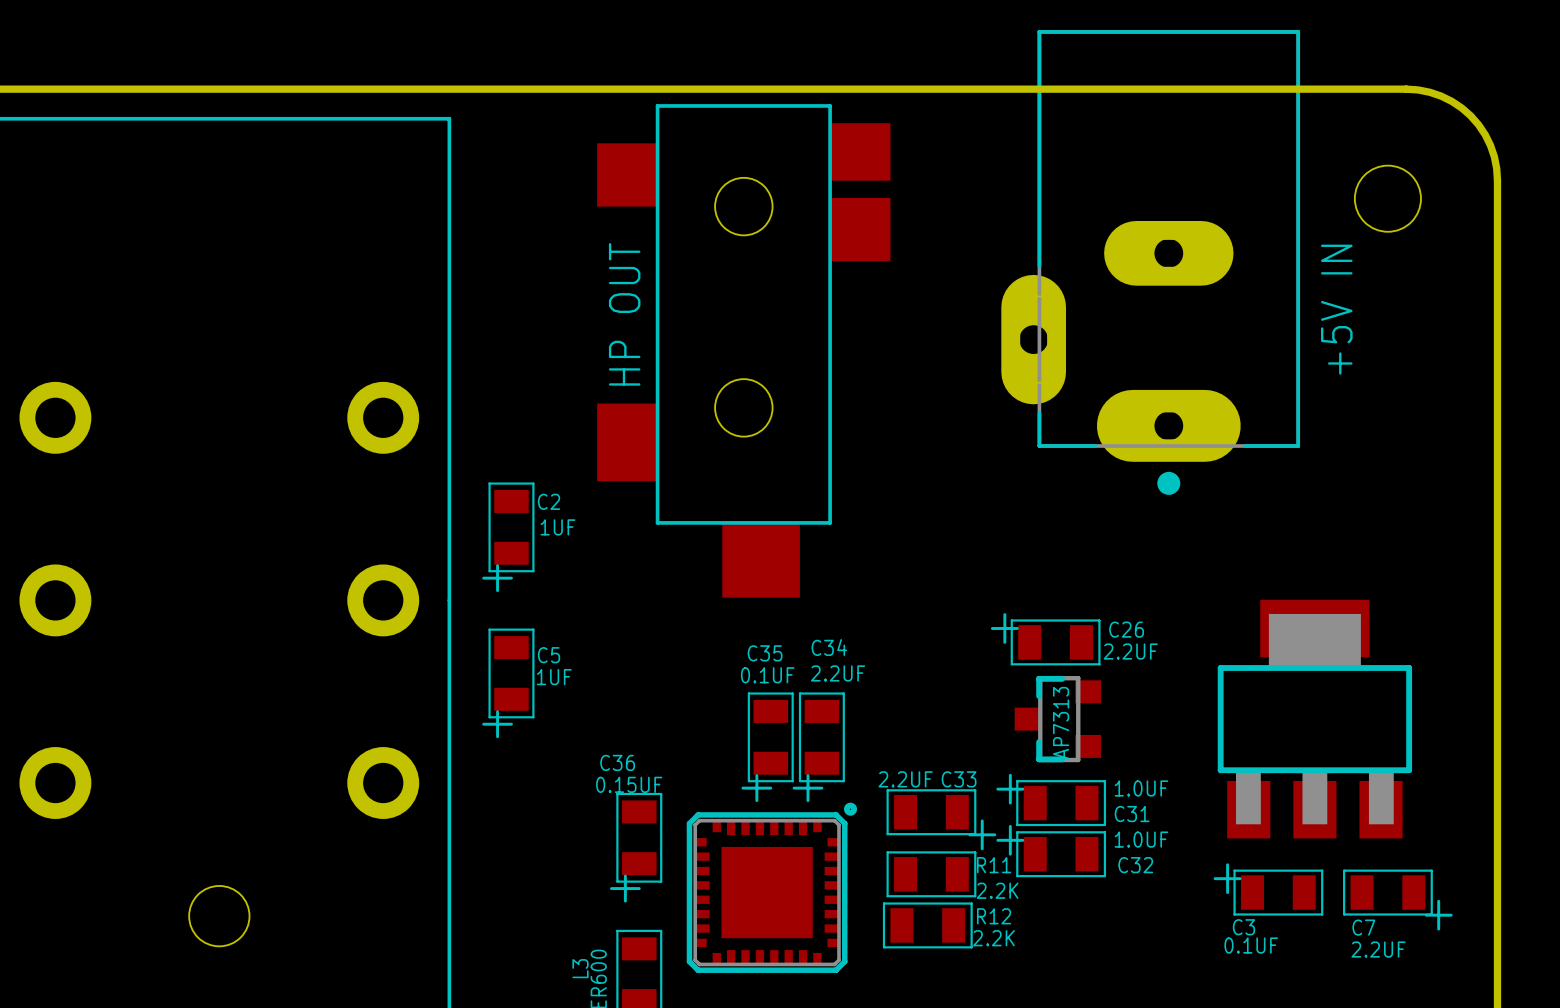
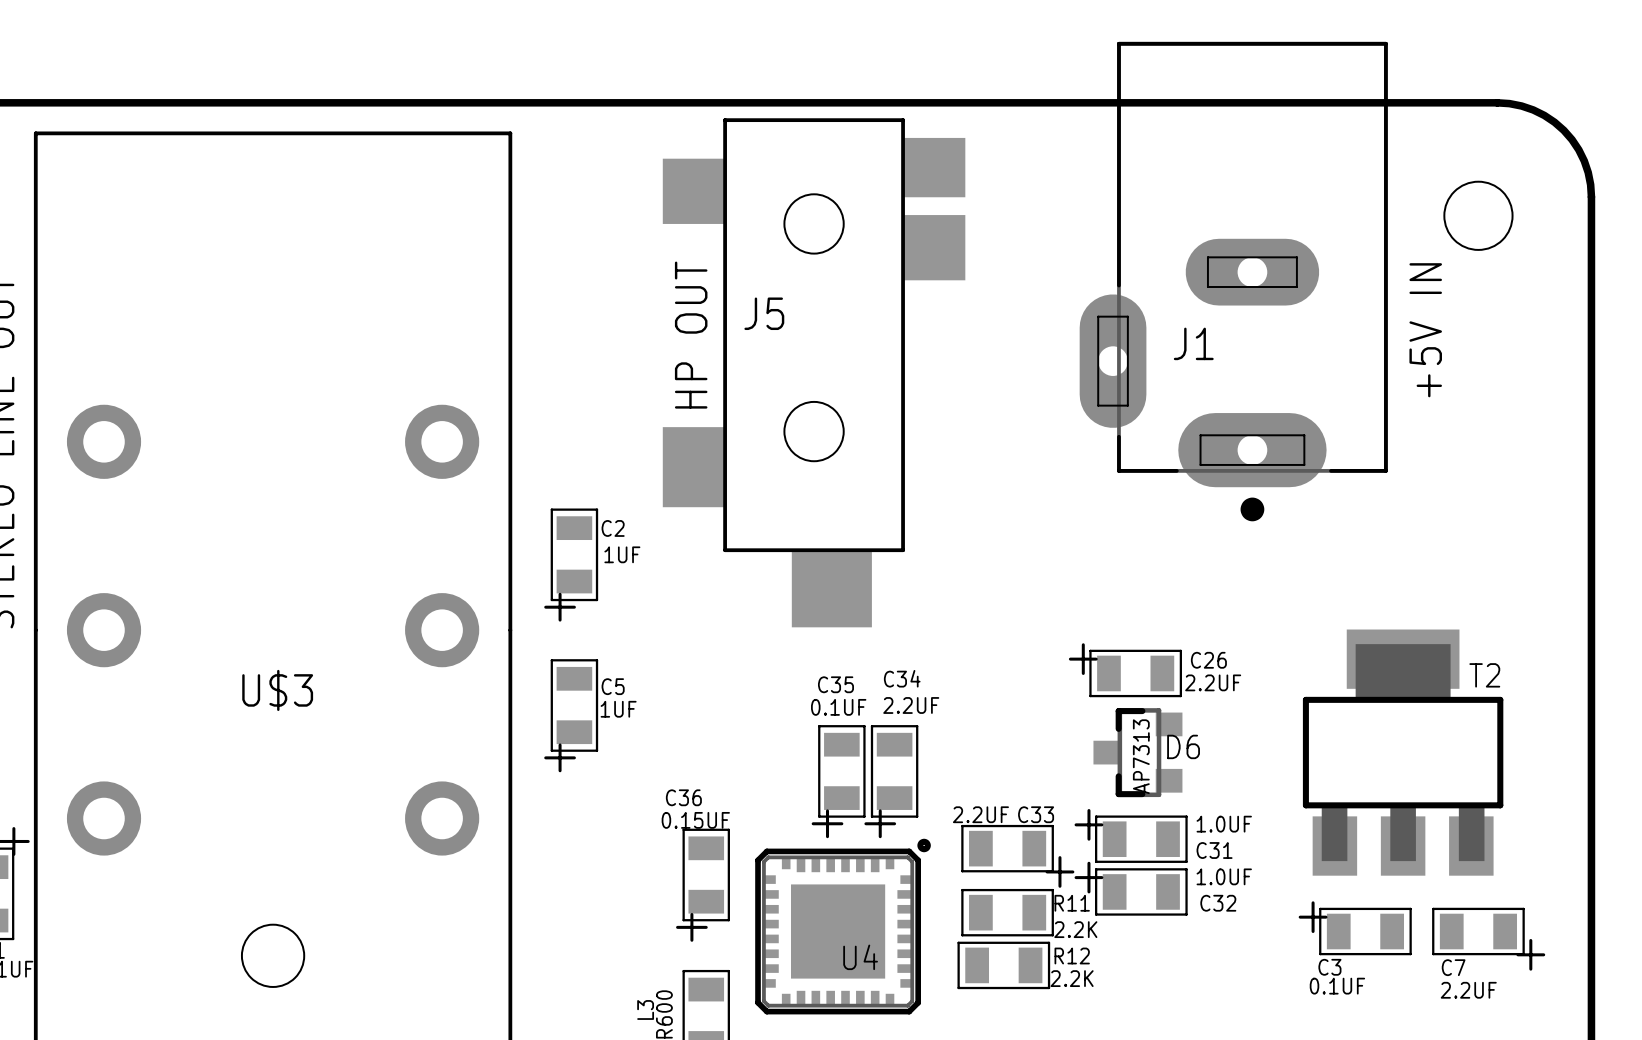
text: none -> J5 (764, 313)
text: none -> J1 (1193, 343)
text: none -> T2 (1484, 675)
text: none -> U$3 (277, 690)
text: none -> D6 (1183, 746)
text: none -> U4 (860, 957)

